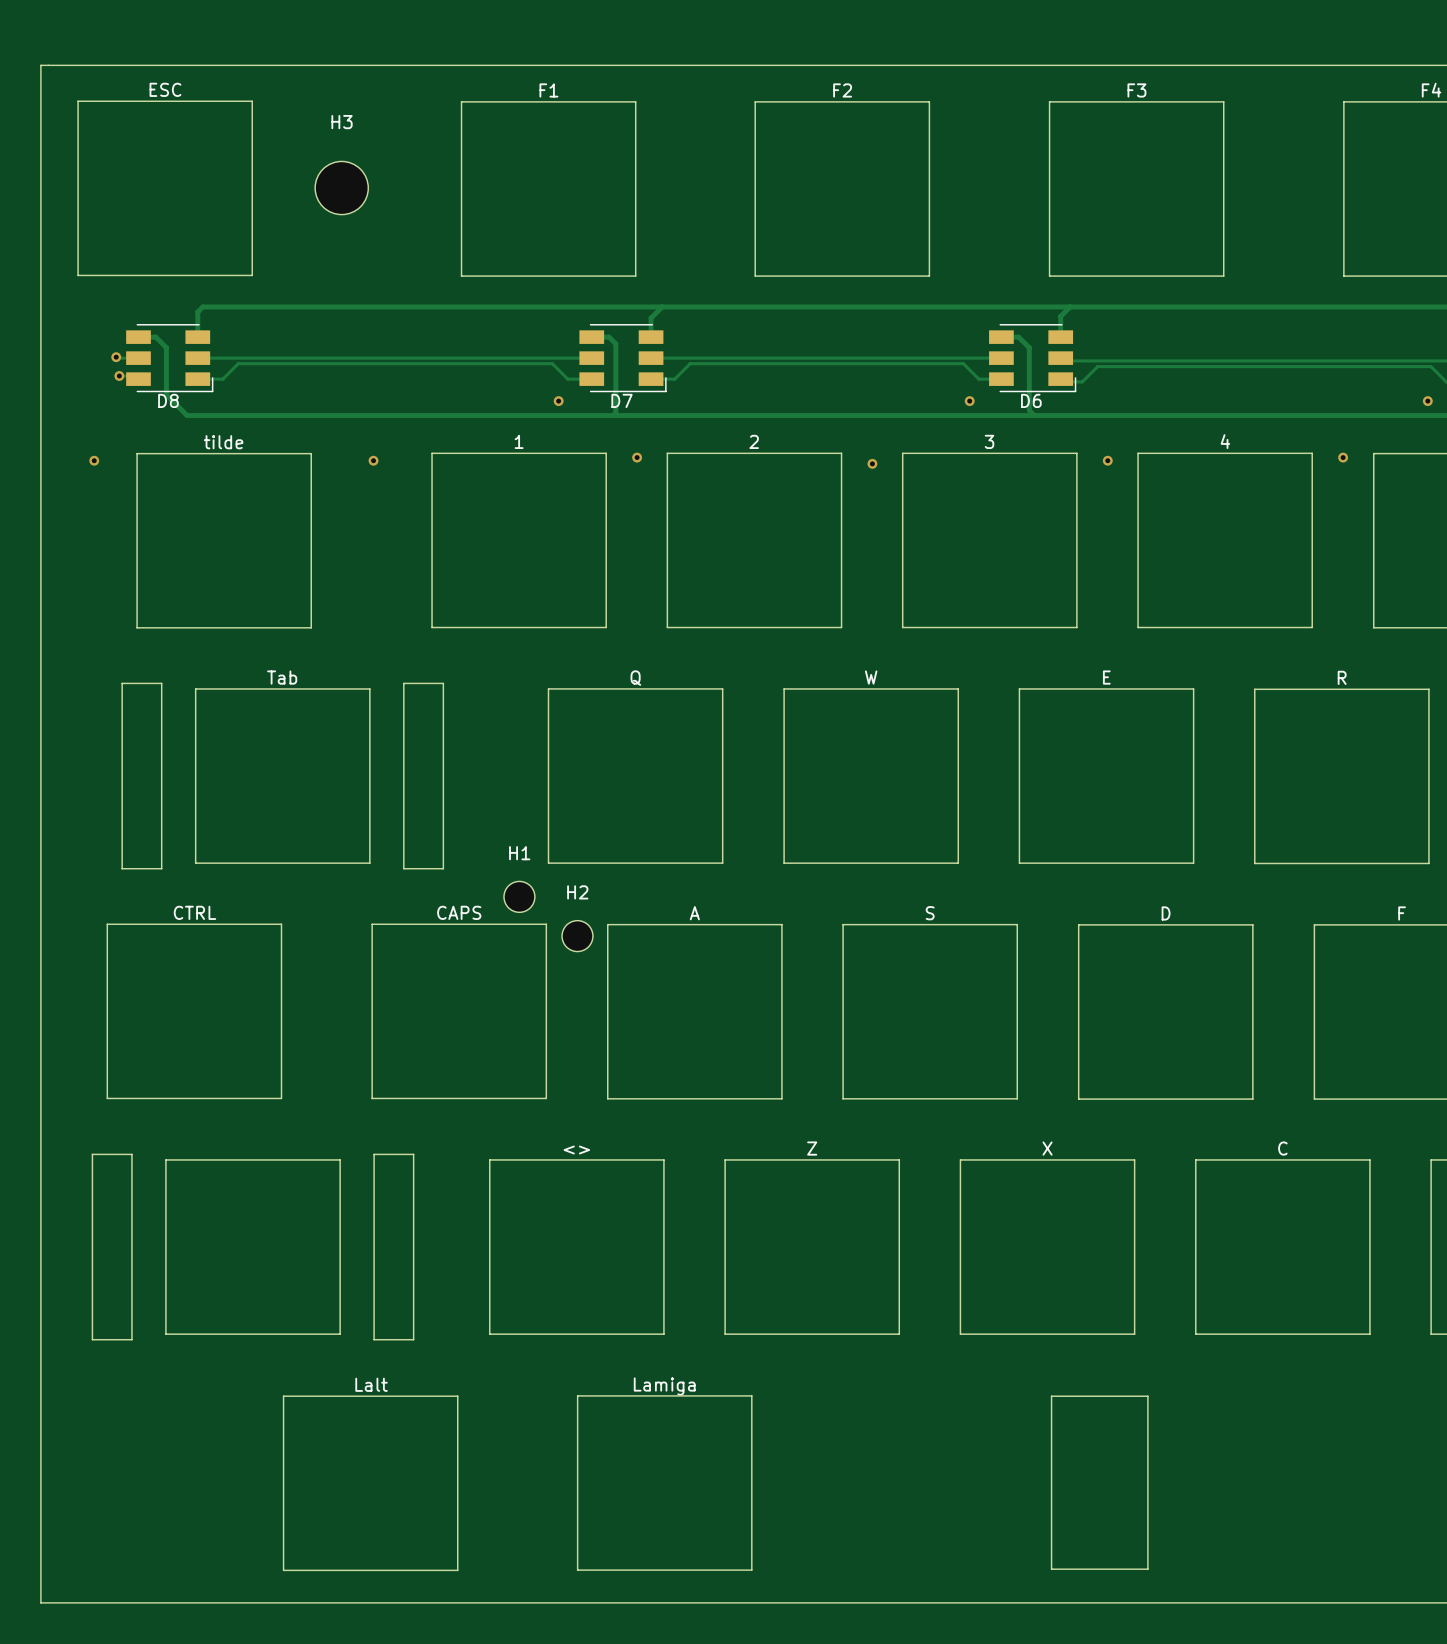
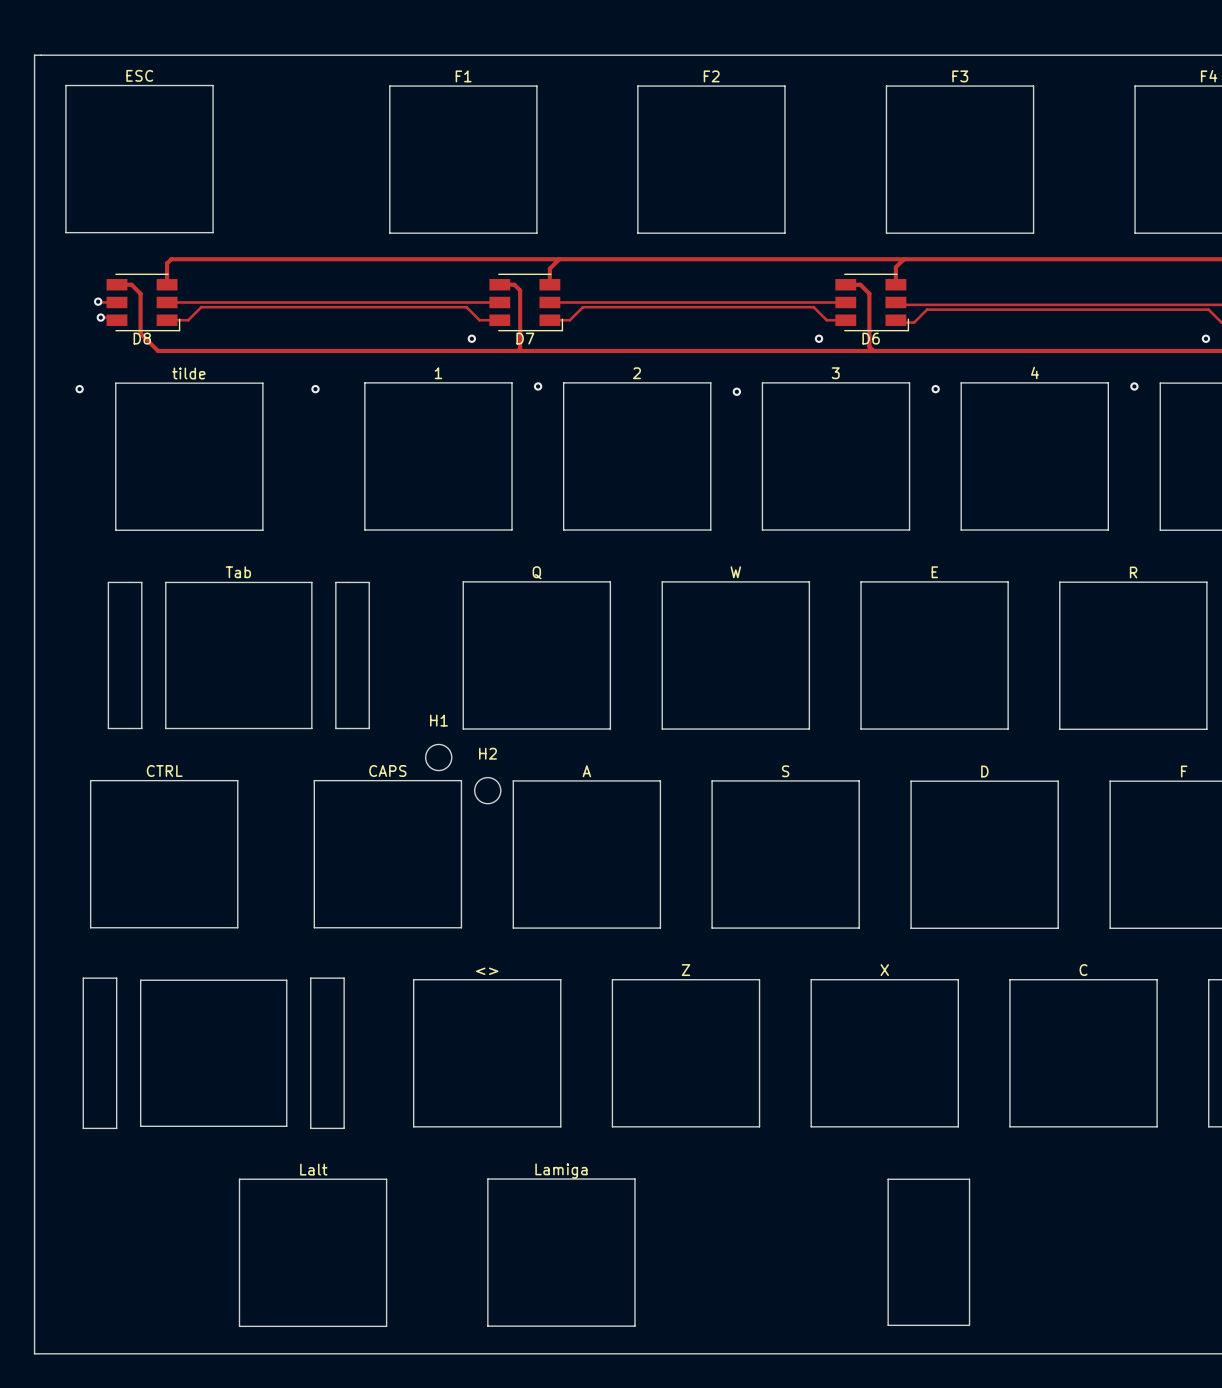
H3: (341, 188) -> none
drawing shape: [121, 670, 445, 870] -> [107, 566, 370, 730]
drawing shape: [91, 1153, 415, 1341] -> [82, 977, 345, 1130]

